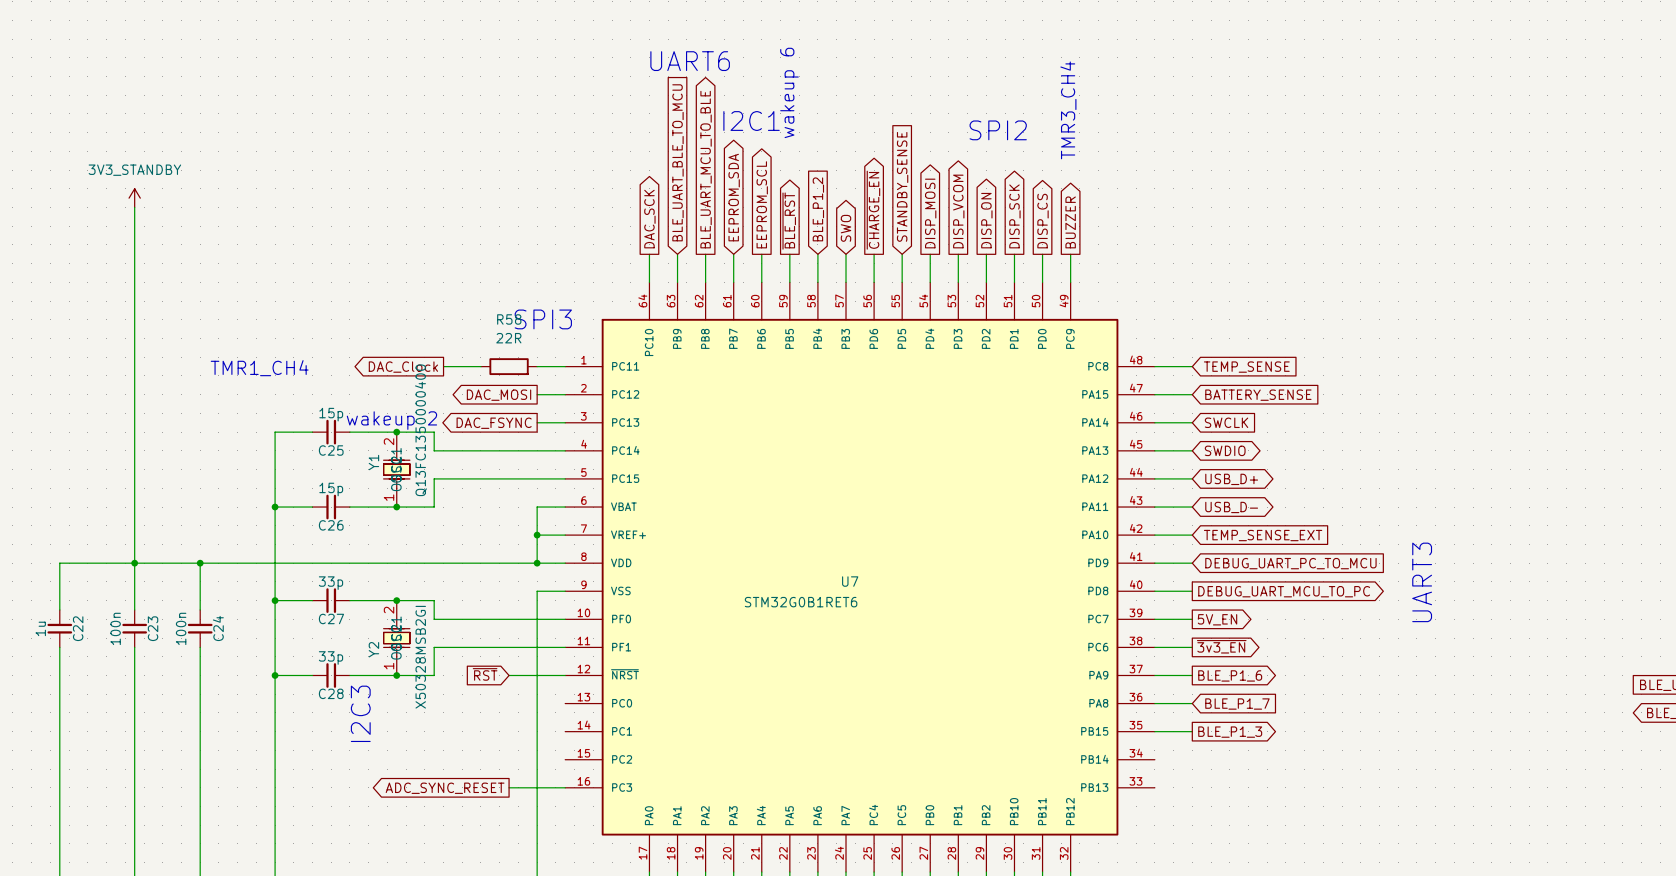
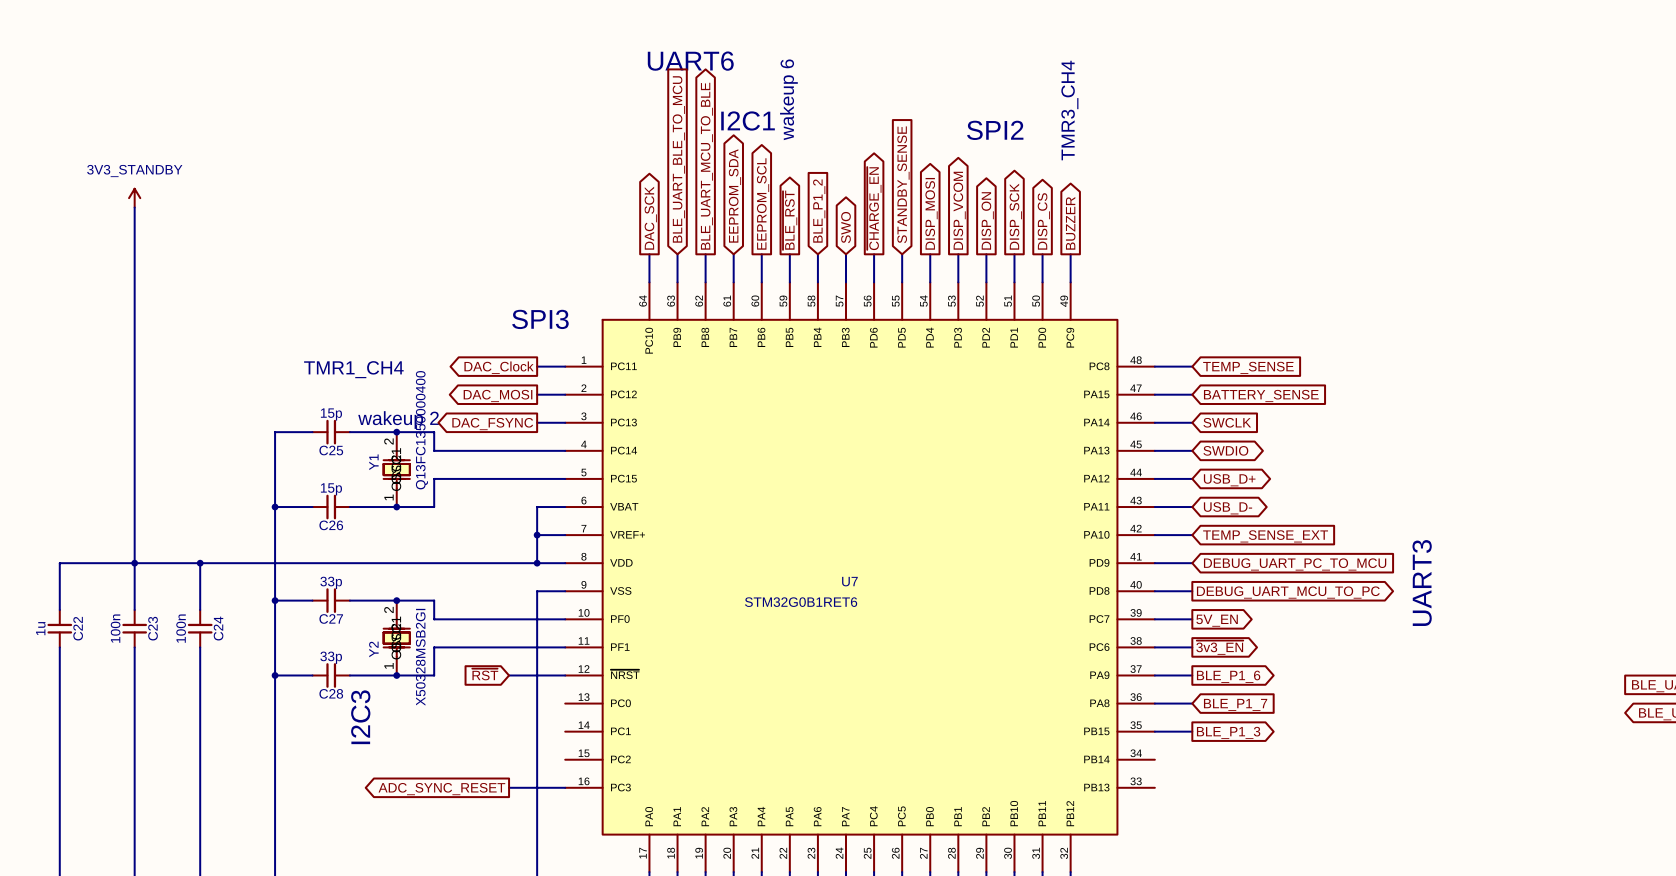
wire: (443, 366) (480, 366) -> none
R58: 22R (509, 366) -> none
global label position: DAC_Clock (403, 367) -> DAC_Clock (499, 367)
text position: TMR1_CH4 (259, 368) -> TMR1_CH4 (353, 369)

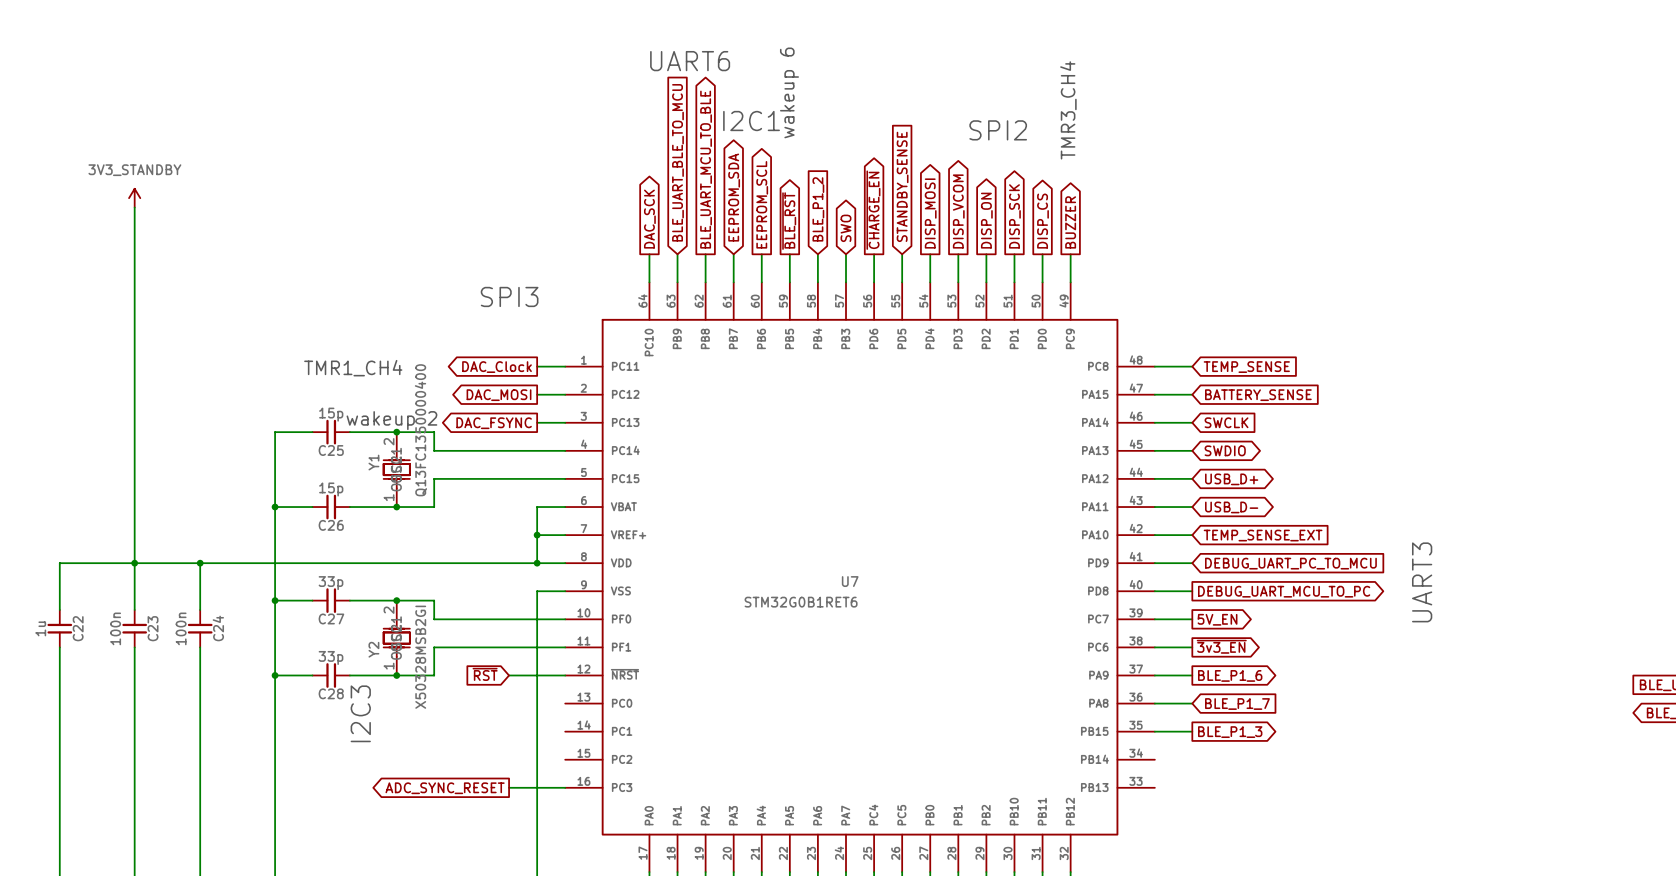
text position: SPI3 (540, 319) -> SPI3 (509, 296)

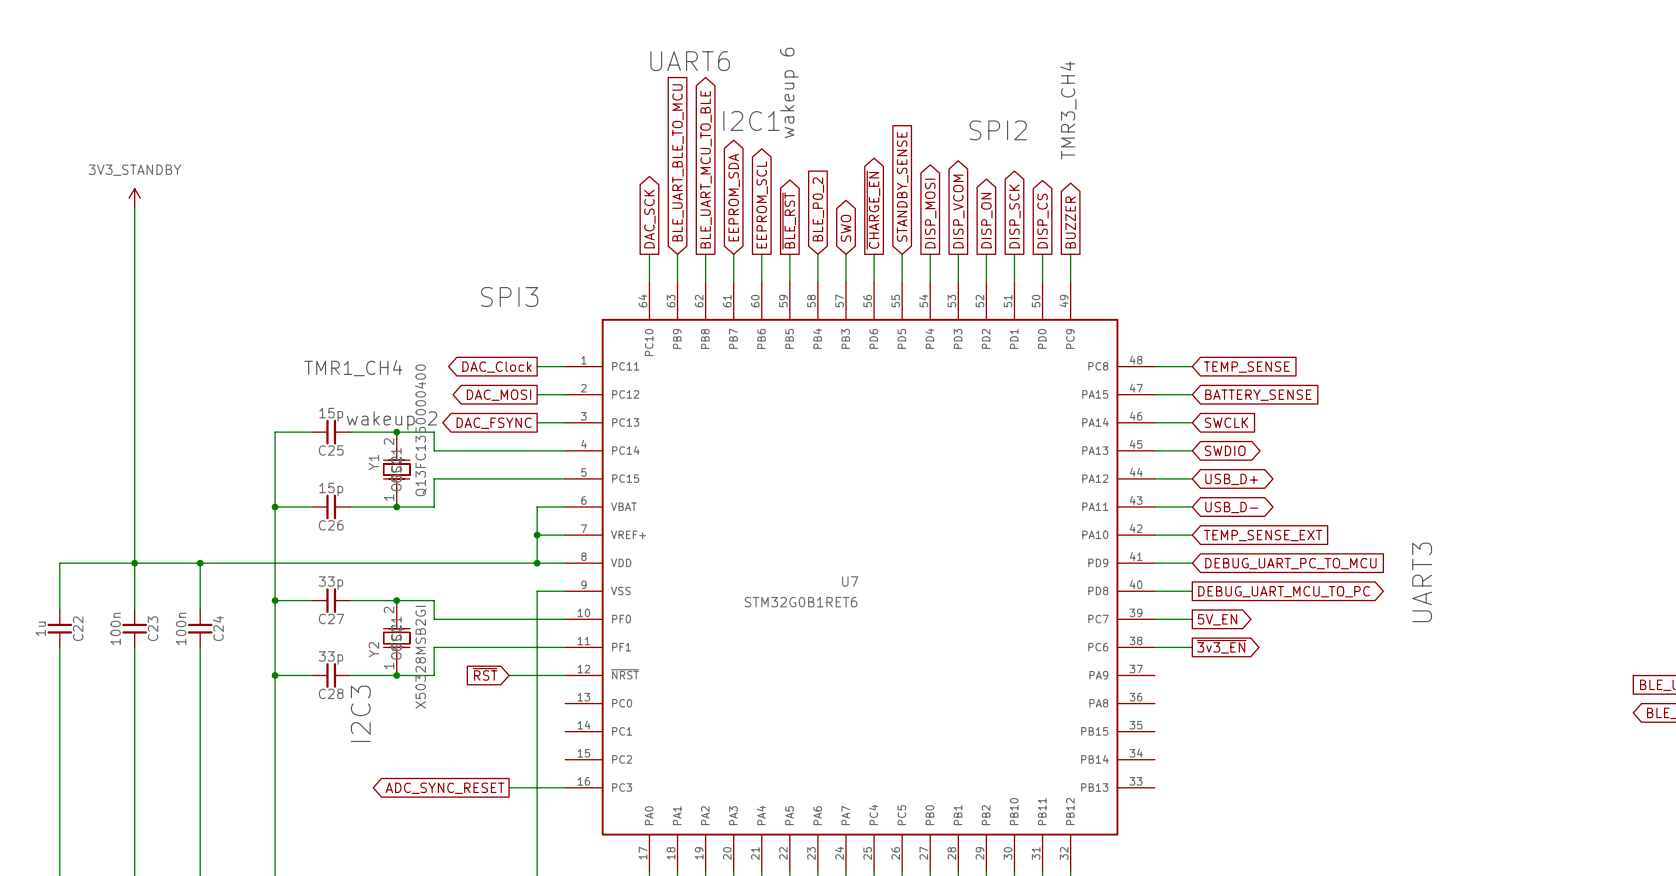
global label: BLE_P1_2 (818, 209) -> BLE_P0_2 (818, 209)
wire: (1154, 675) (1192, 675) -> none
global label: BLE_P1_6 (1230, 675) -> none
wire: (1154, 703) (1192, 703) -> none
global label: BLE_P1_7 (1237, 704) -> none
wire: (1154, 731) (1192, 731) -> none
global label: BLE_P1_3 (1230, 732) -> none

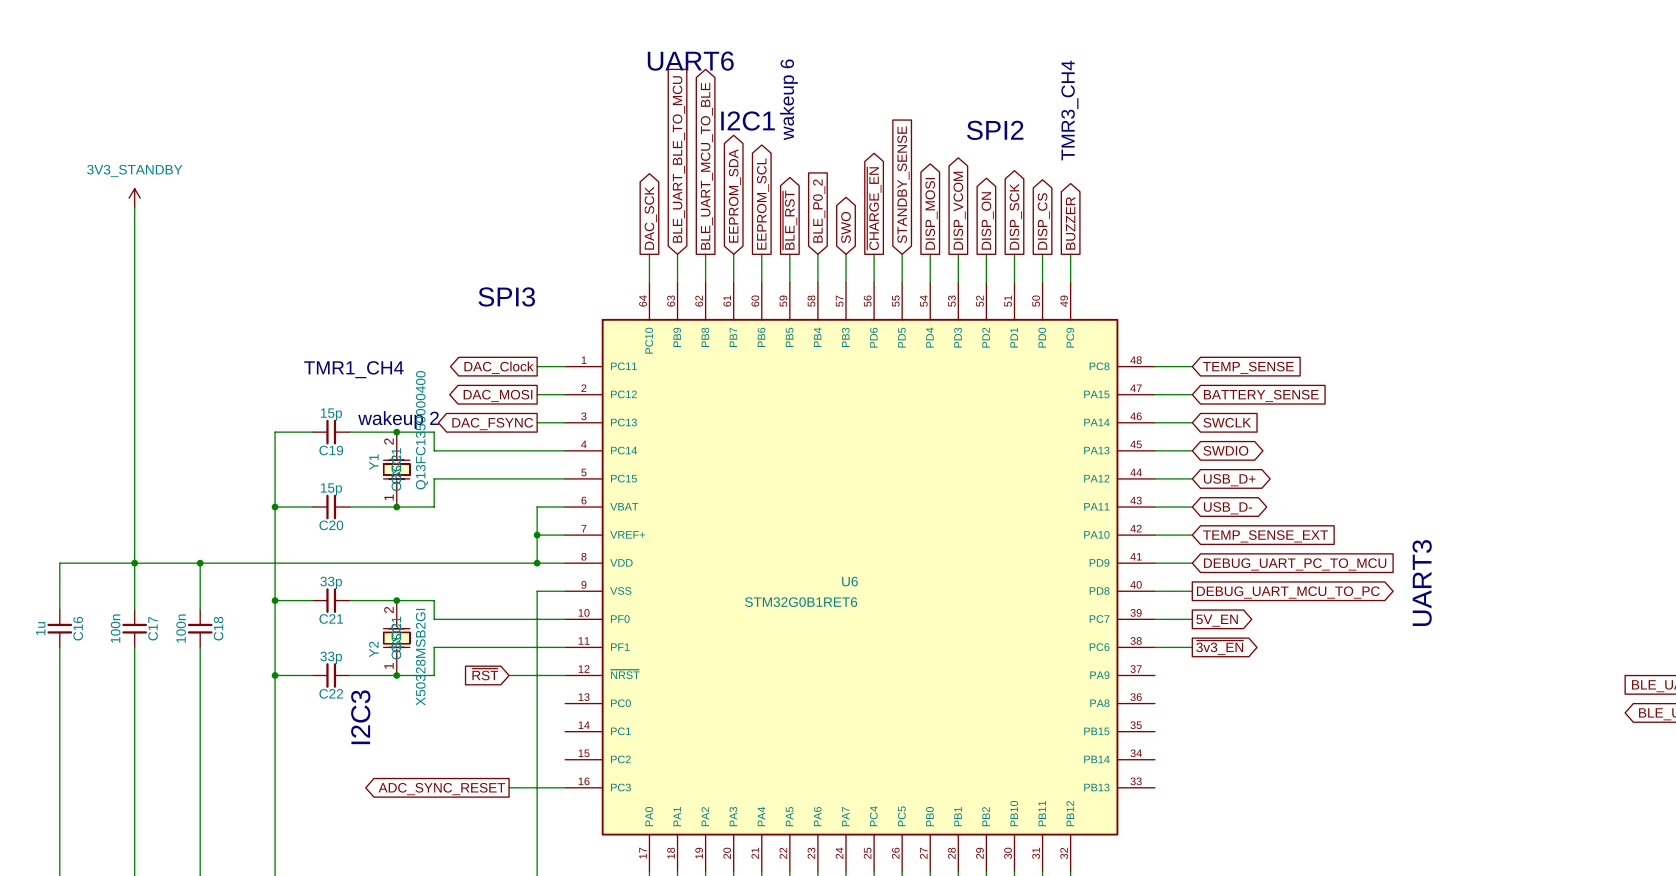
C25 name: C25 (331, 450) -> C19 (331, 450)
C26 name: C26 (331, 525) -> C20 (331, 525)
U7 name: U7 (850, 581) -> U6 (849, 581)
C27 name: C27 (331, 618) -> C21 (331, 618)
C22 name: C22 (78, 628) -> C16 (78, 628)
C23 name: C23 (153, 628) -> C17 (153, 628)
C24 name: C24 (218, 628) -> C18 (218, 628)
C28 name: C28 (331, 693) -> C22 (331, 693)

